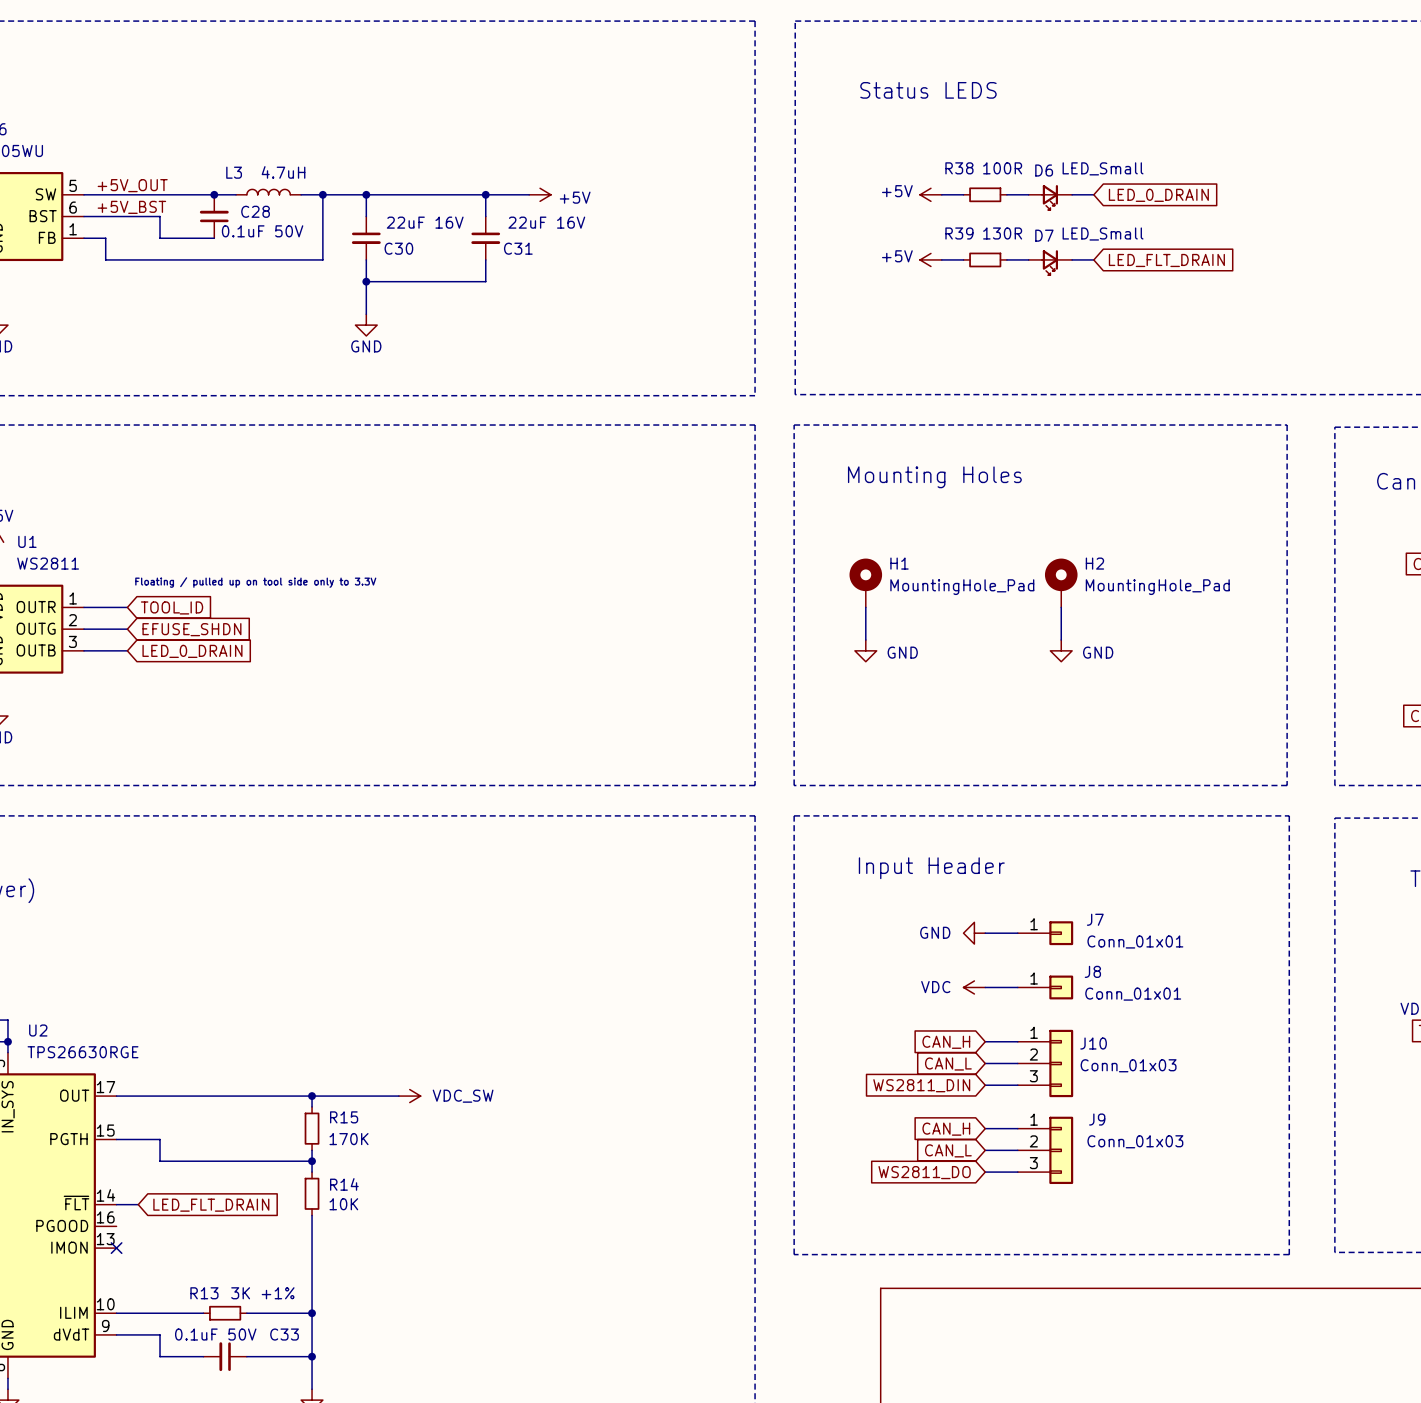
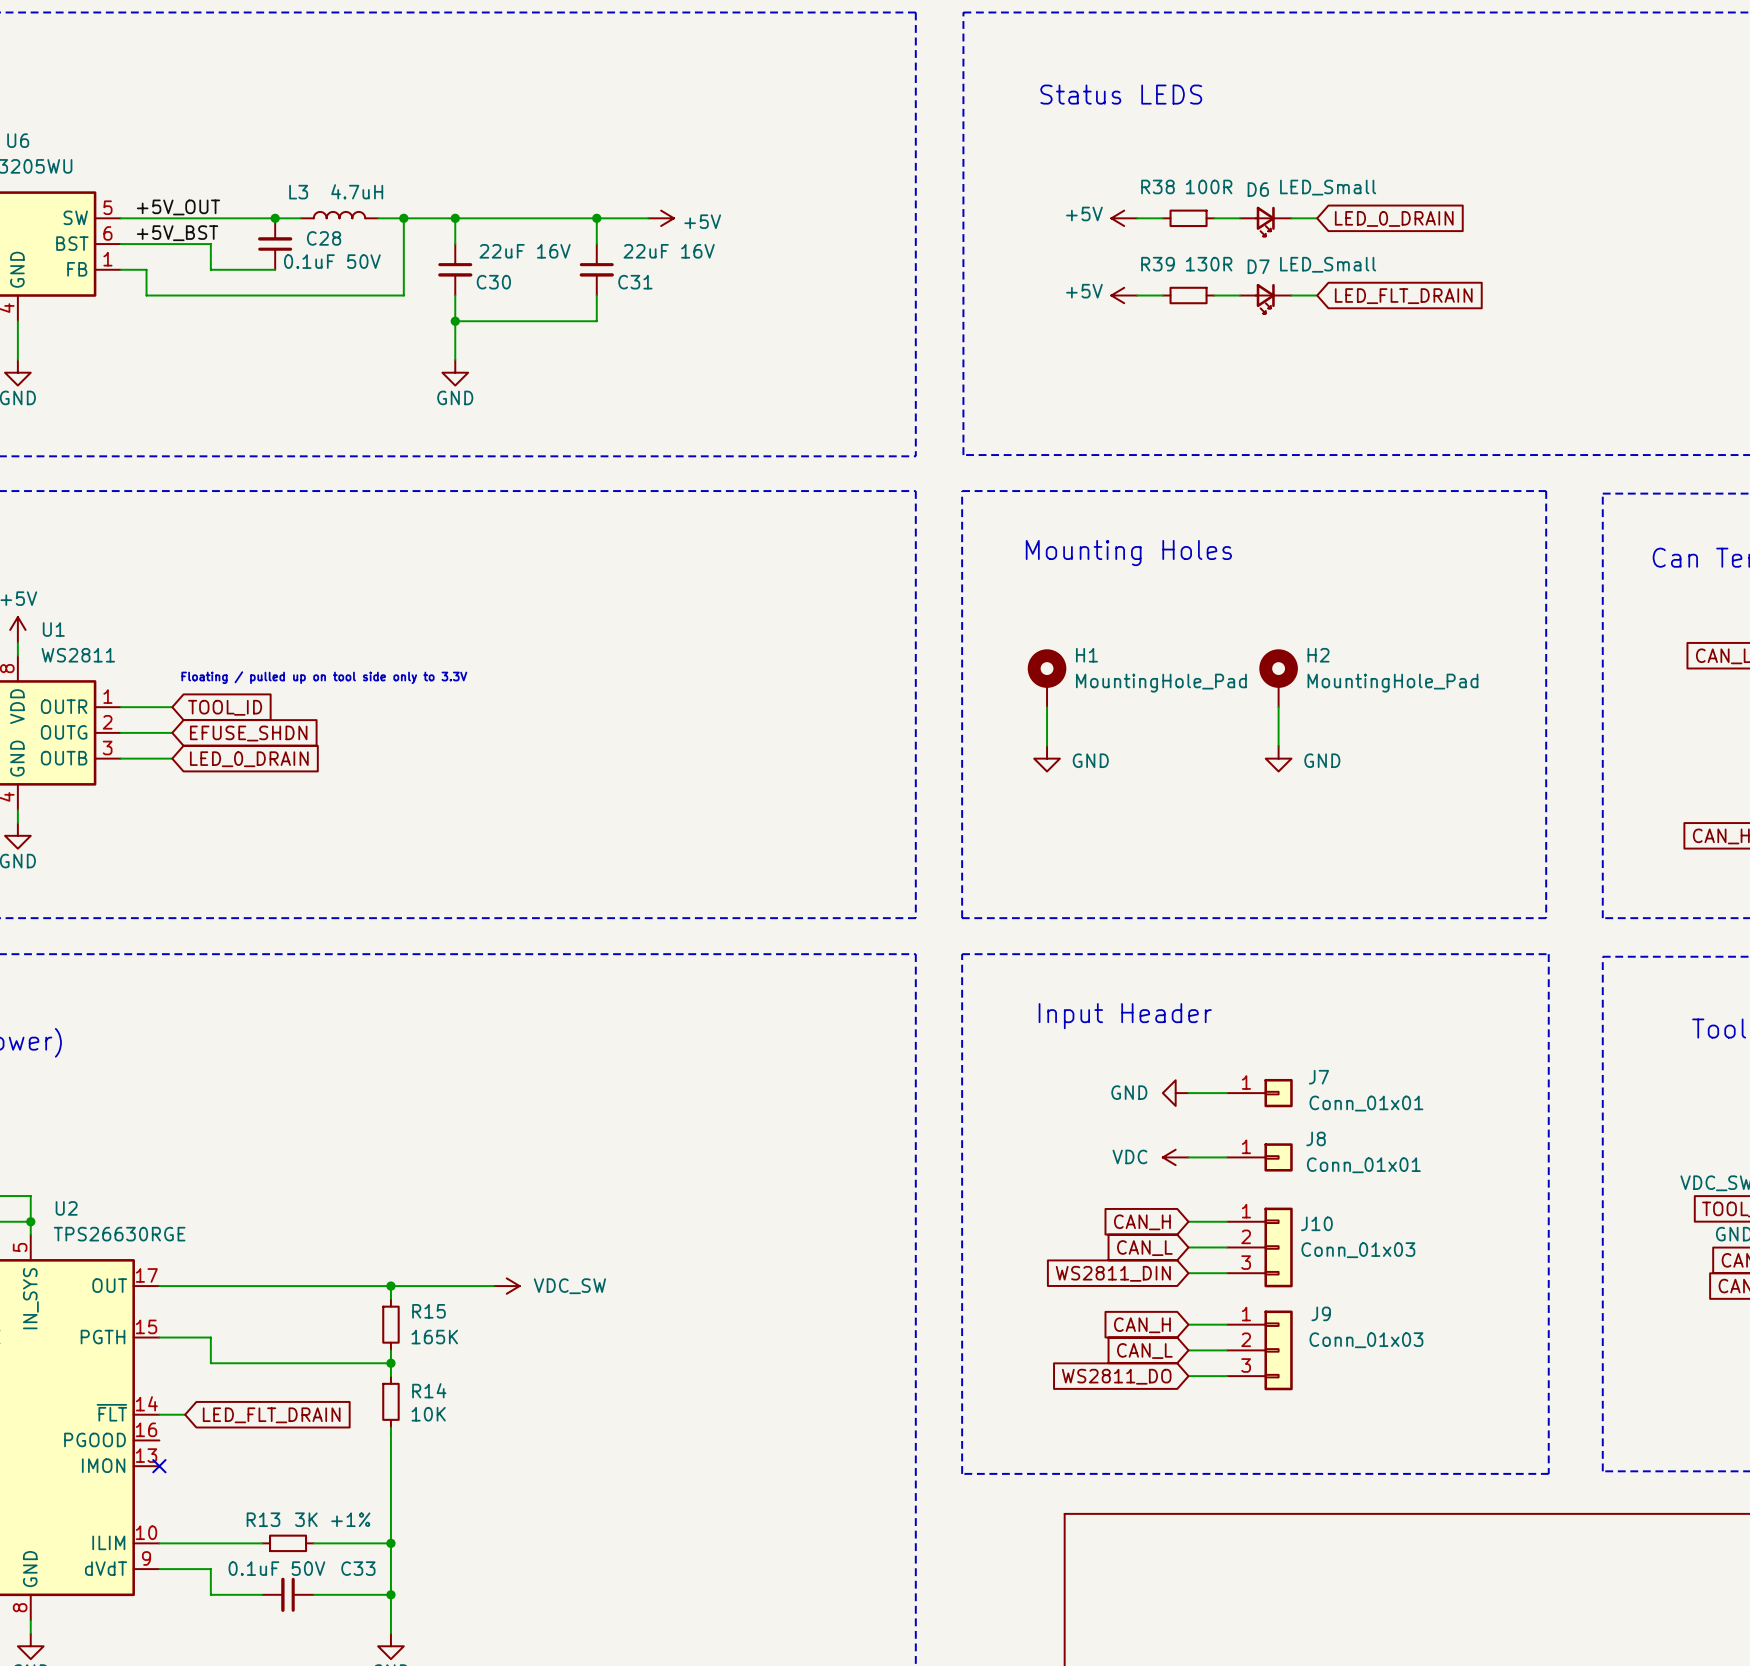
R15 value: 170K (349, 1139) -> 165K (434, 1337)

